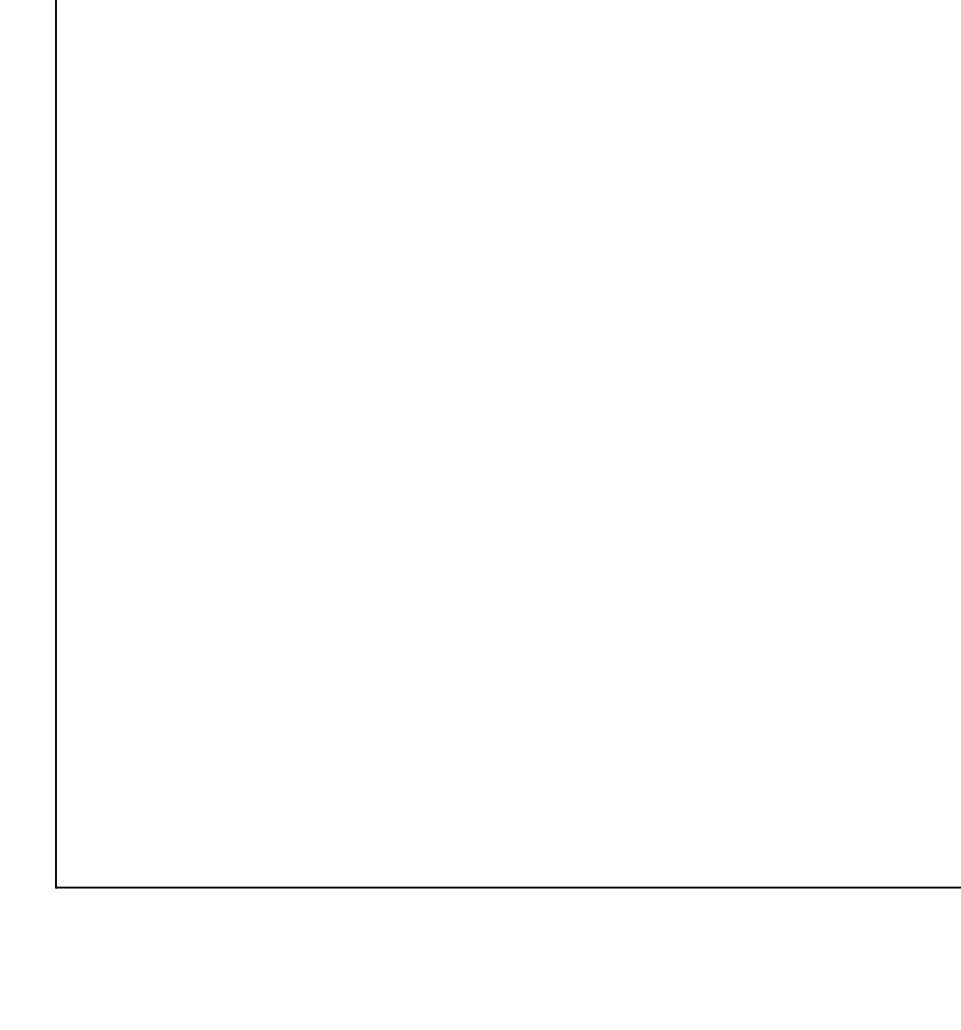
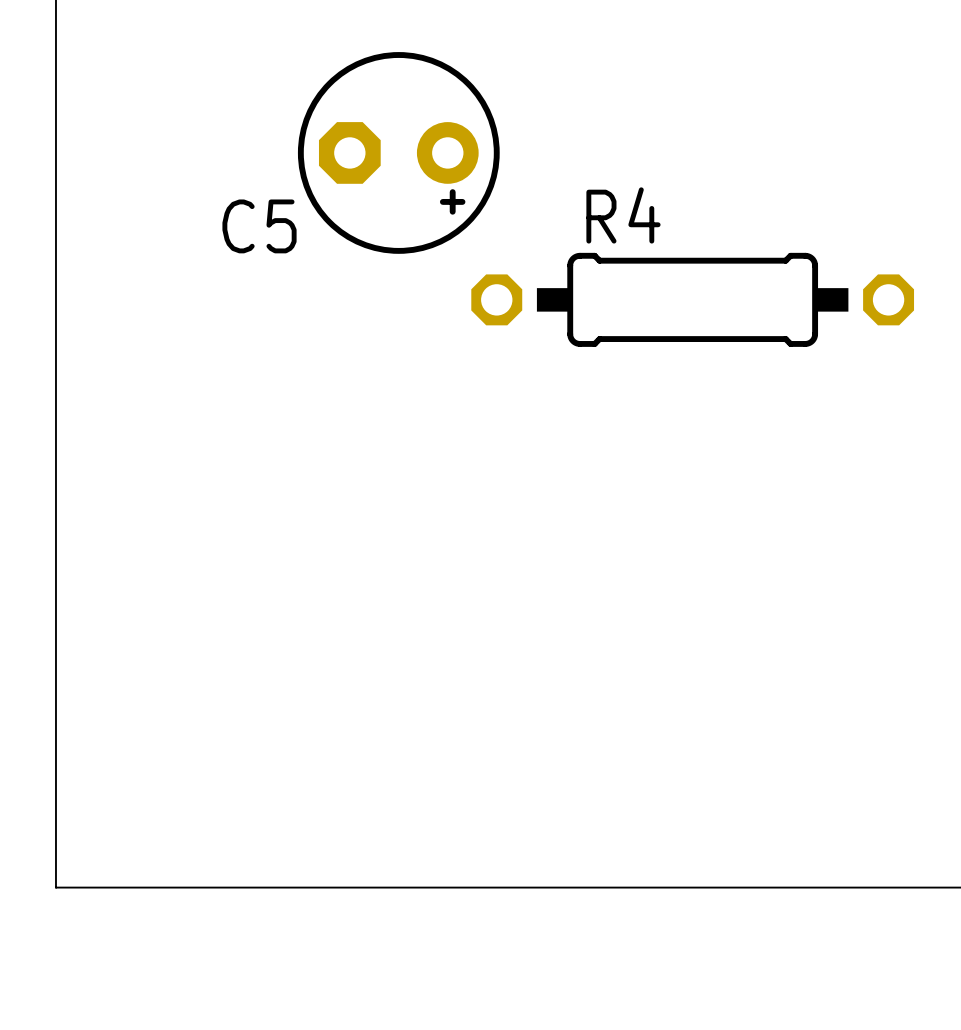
C5: none -> (398, 152)
R4: none -> (692, 299)

